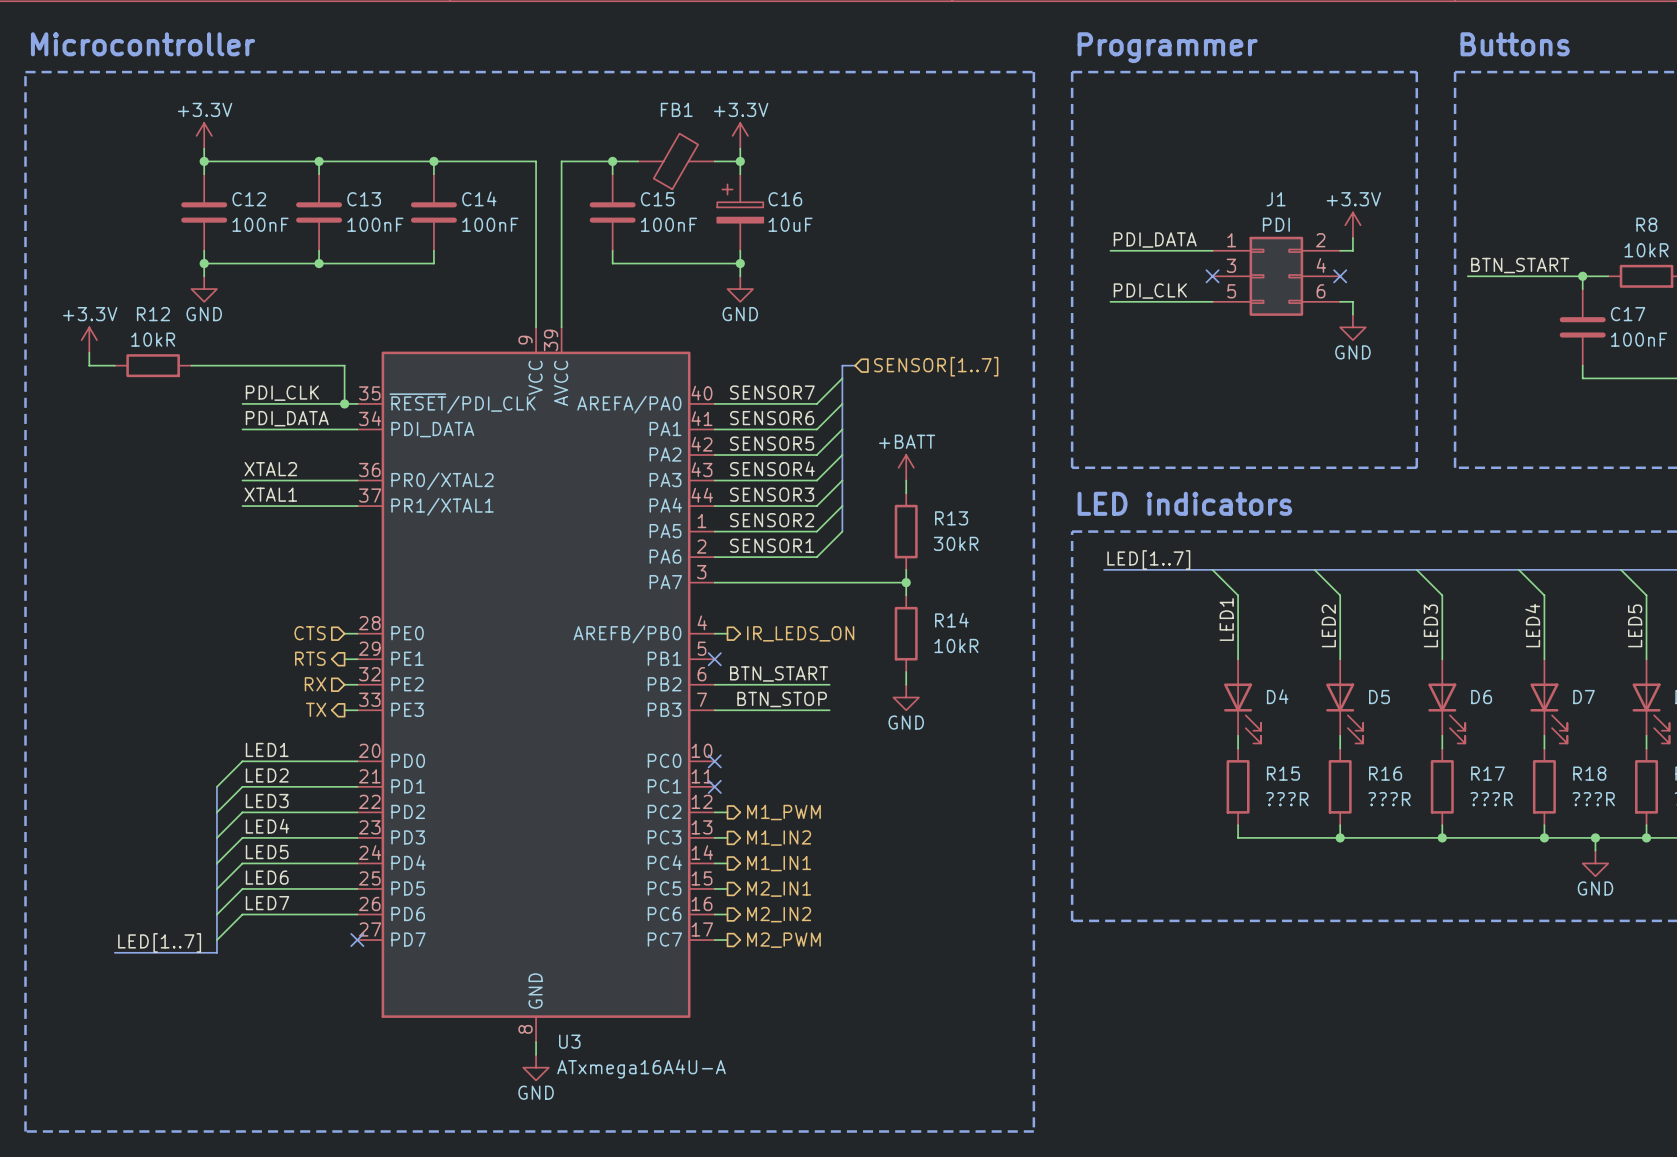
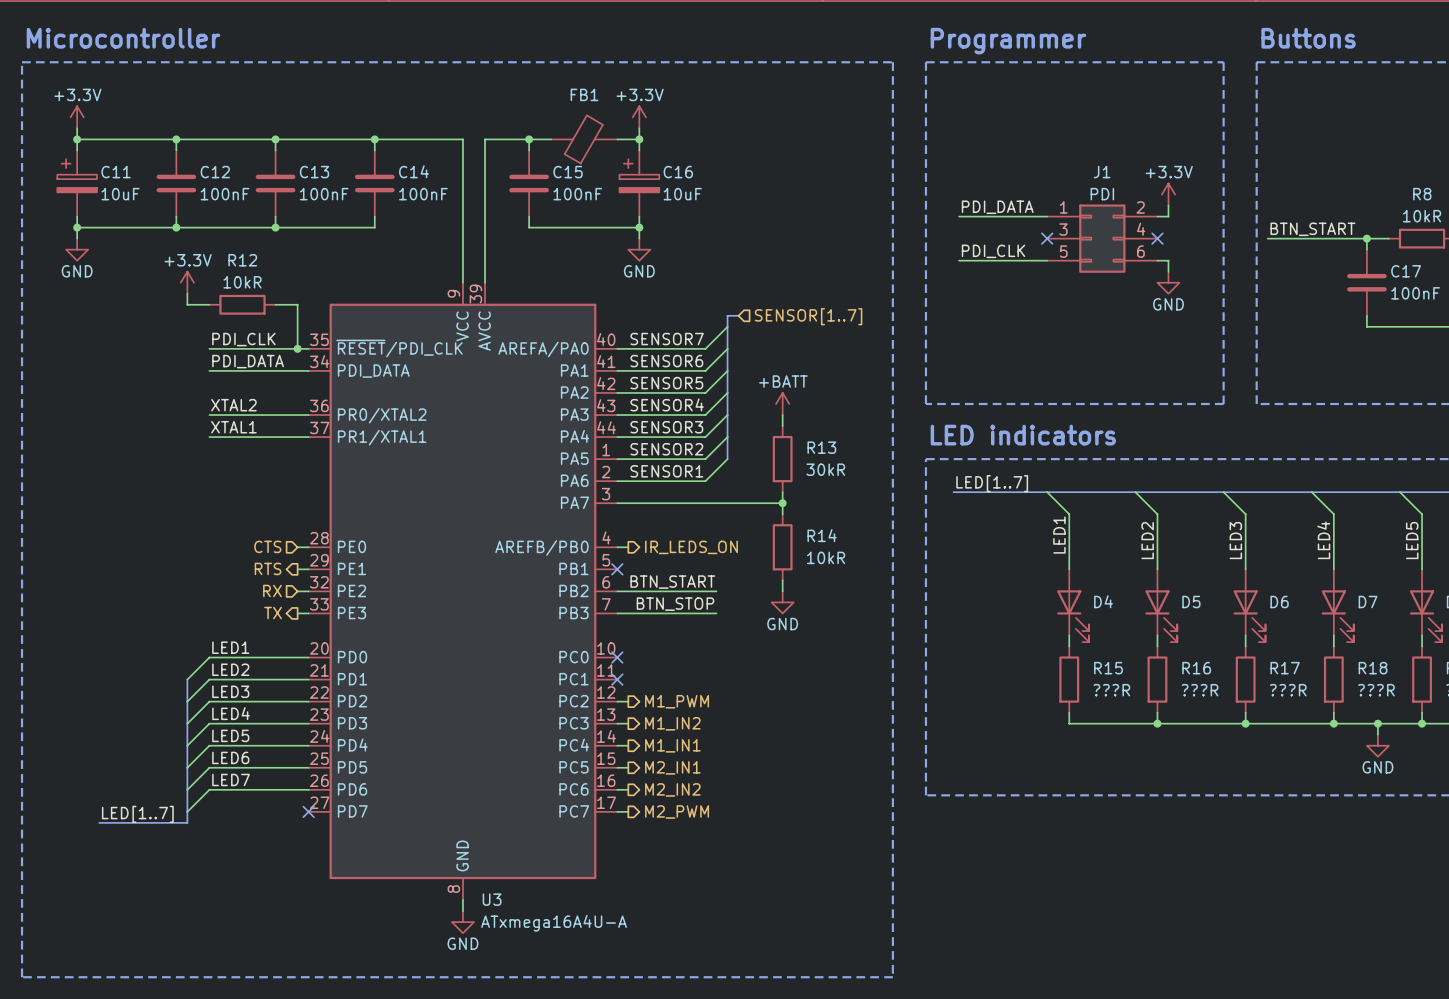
power symbol: none -> +3.3V (77, 117)
power symbol: +3.3V (204, 135) -> none
wire: none -> (77, 128) (77, 150)
wire: (204, 148) (204, 161) -> (77, 139) (176, 139)
junction: none -> (77, 139)
C11: none -> 10uF (77, 183)
wire: none -> (77, 216) (77, 238)
junction: none -> (77, 227)
wire: (204, 263) (204, 276) -> (176, 227) (77, 227)
power symbol position: GND (204, 289) -> GND (77, 249)
power symbol: none -> +3.3V (187, 282)
power symbol: +3.3V (89, 340) -> none
wire: (89, 352) (89, 365) (114, 365) -> (187, 293) (187, 304) (209, 304)
R12 position: (153, 365) -> (242, 304)
wire: (191, 365) (344, 365) -> (275, 304) (297, 304) (297, 315)

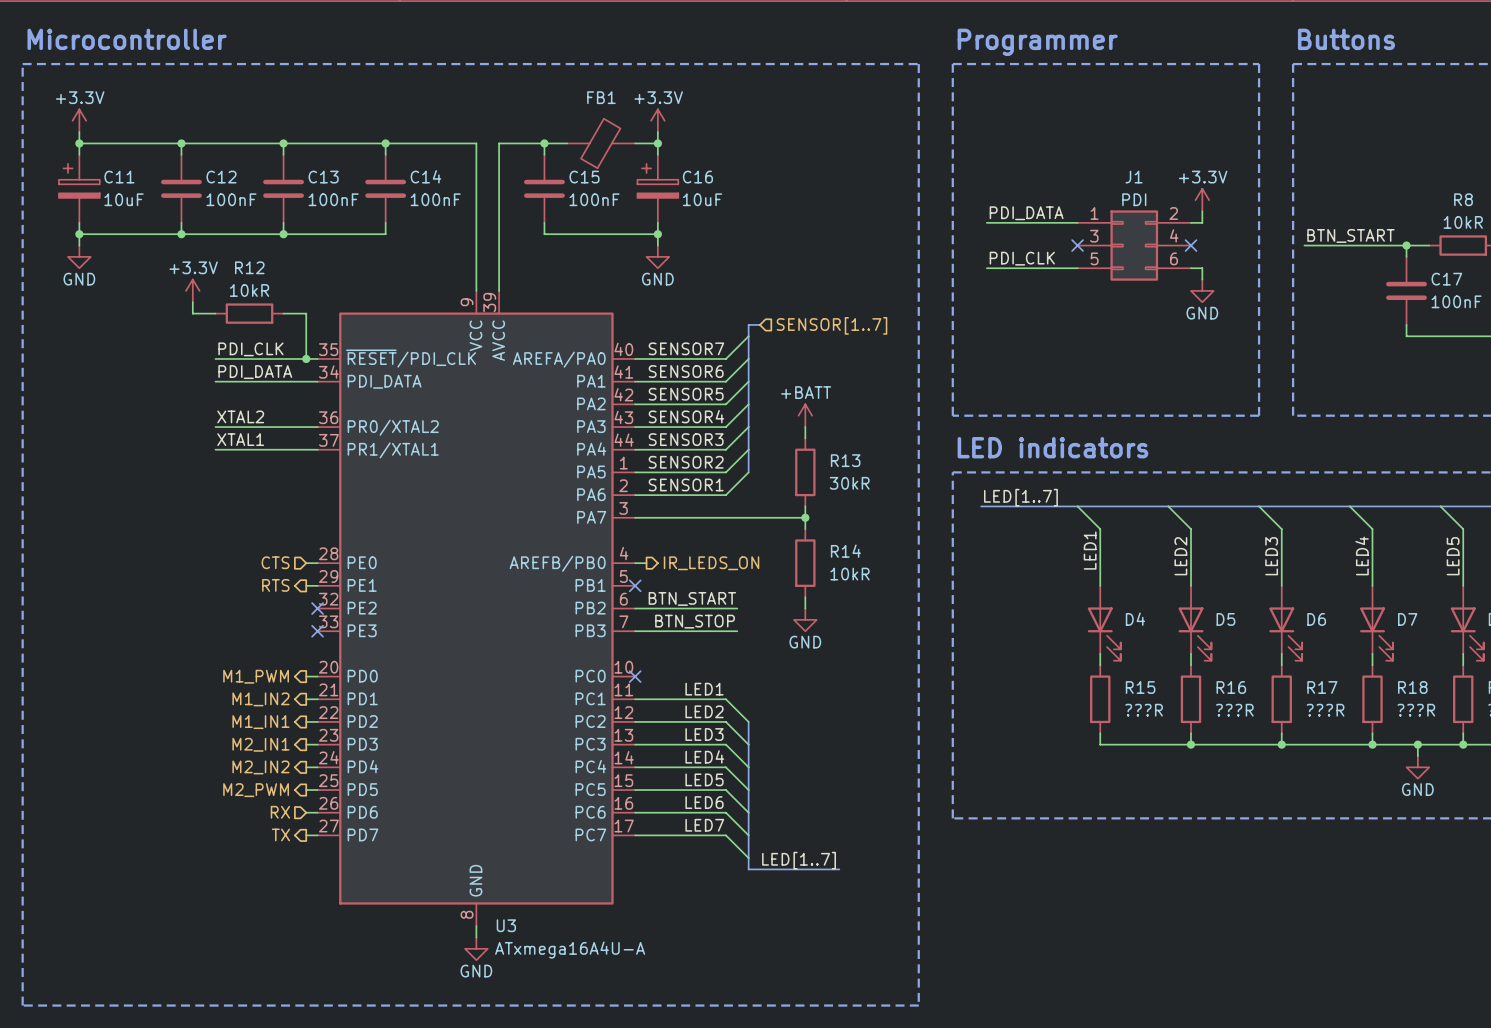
hierarchical label position: RX (272, 590) -> RX (280, 812)
wire: (297, 591) (308, 591) -> none
no-connect mark: none -> (317, 608)
hierarchical label position: TX (273, 613) -> TX (280, 834)
wire: (297, 613) (308, 613) -> (306, 835) (317, 835)
no-connect mark: none -> (317, 631)
label: LED1 (230, 647) -> none
hierarchical label: none -> M1_PWM (256, 676)
wire: (297, 657) (209, 657) (187, 679) -> none
label: LED2 (230, 669) -> none
label: none -> LED1 (704, 689)
bus: (187, 679) (187, 822) (99, 822) -> none
hierarchical label: none -> M1_IN2 (260, 699)
wire: (297, 679) (209, 679) (187, 701) -> none
wire: none -> (635, 699) (725, 699) (748, 721)
no-connect mark: (617, 679) -> none
label: LED3 (230, 691) -> none
label: none -> LED2 (704, 711)
hierarchical label: none -> M1_IN1 (260, 722)
wire: (297, 701) (209, 701) (187, 723) -> none
wire: none -> (646, 721) (725, 721) (748, 744)
hierarchical label: M1_PWM (677, 701) -> none
bus: none -> (748, 721) (748, 869) (839, 869)
label: LED4 (231, 713) -> none
label: none -> LED3 (704, 734)
hierarchical label: none -> M2_IN1 (260, 744)
wire: (297, 723) (209, 723) (187, 745) -> none
wire: none -> (646, 744) (725, 744) (748, 767)
hierarchical label: M1_IN2 (672, 723) -> none
label: LED5 (230, 735) -> none
label: none -> LED4 (704, 756)
hierarchical label: none -> M2_IN2 (260, 767)
wire: (297, 745) (209, 745) (187, 767) -> none
wire: none -> (646, 767) (725, 767) (748, 790)
hierarchical label: M1_IN1 (672, 745) -> none
label: LED6 (230, 757) -> none
label: none -> LED5 (704, 779)
hierarchical label: none -> M2_PWM (256, 790)
wire: (297, 767) (209, 767) (187, 789) -> none
wire: none -> (646, 790) (725, 790) (748, 812)
hierarchical label: M2_IN1 (672, 767) -> none
label: LED7 (231, 779) -> none
label: none -> LED6 (704, 802)
wire: (297, 789) (209, 789) (187, 811) -> none
wire: none -> (646, 812) (725, 812) (748, 835)
hierarchical label: M2_IN2 (672, 789) -> none
label: none -> LED7 (704, 825)
no-connect mark: (308, 811) -> none
wire: none -> (646, 835) (725, 835) (748, 858)
hierarchical label: M2_PWM (677, 811) -> none
label: LED[1..7] (137, 814) -> none
label: none -> LED[1..7] (799, 860)

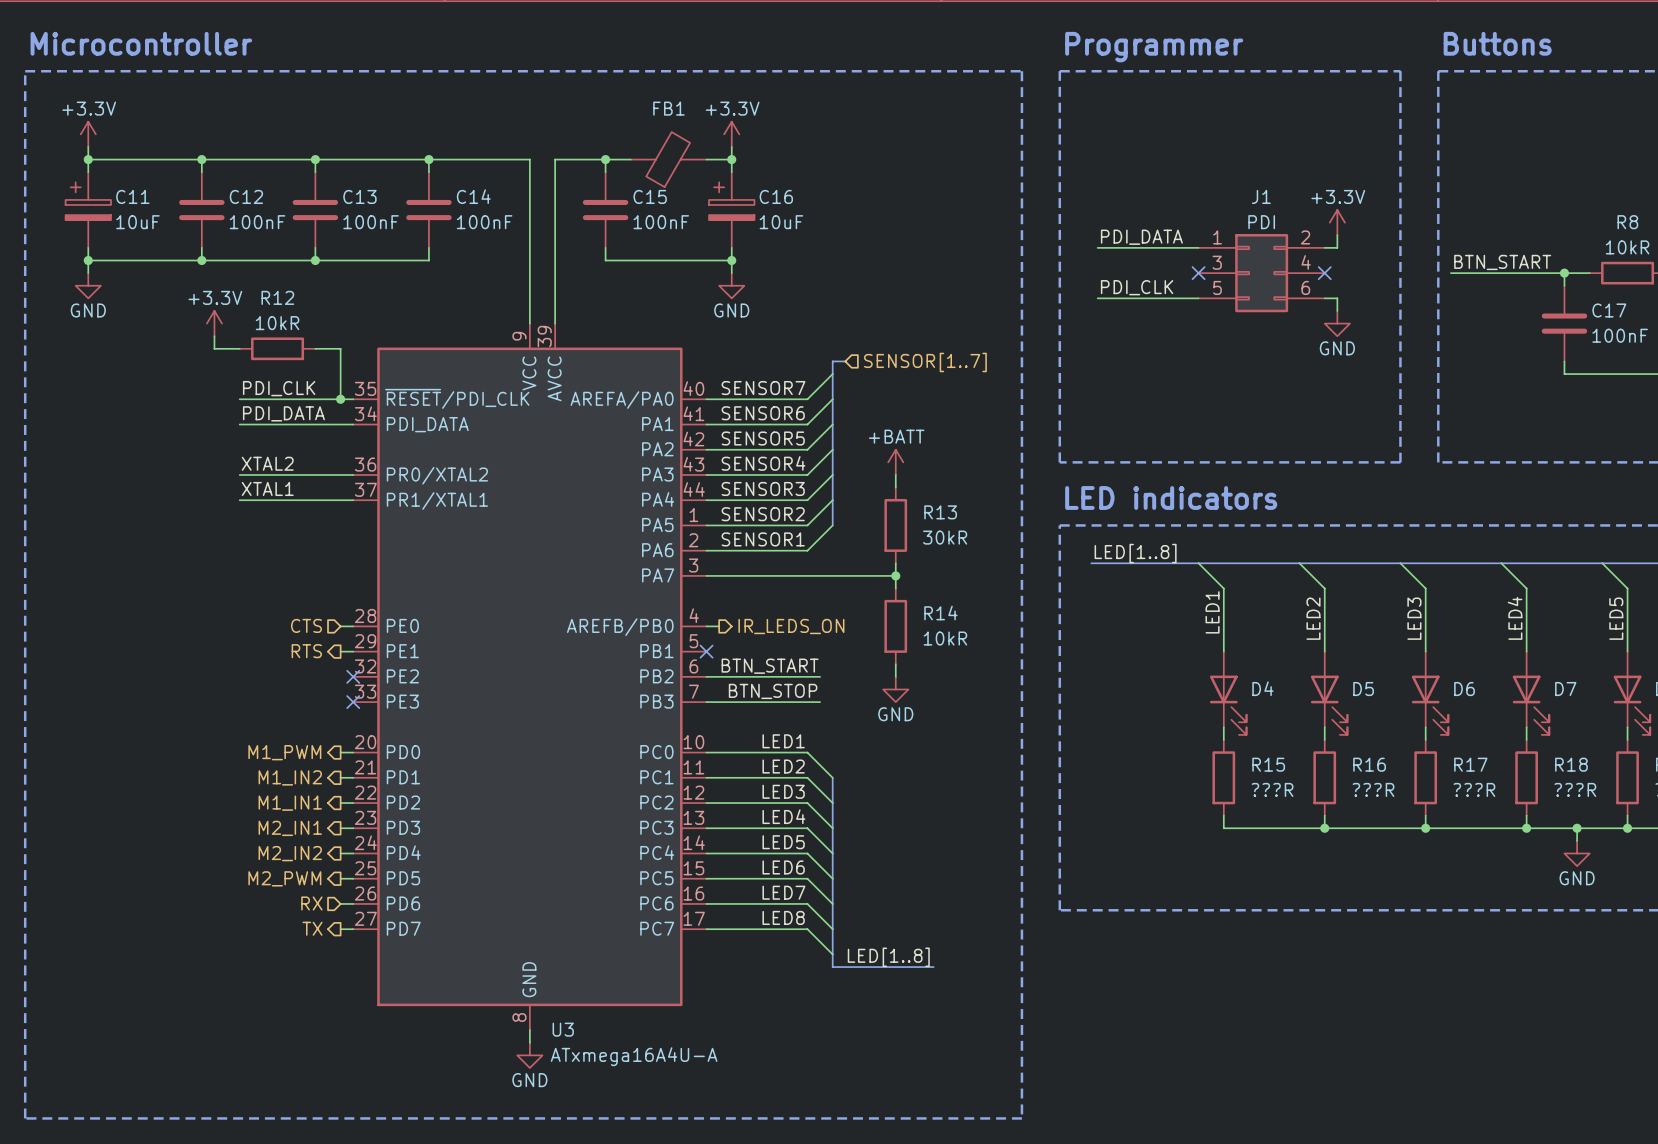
label: LED[1..7] (1020, 497) -> LED[1..8] (1135, 553)
label: none -> LED1 (783, 741)
wire: none -> (706, 752) (807, 752) (832, 777)
no-connect mark: (635, 676) -> none
label: LED1 (704, 689) -> LED2 (783, 766)
bus: none -> (832, 777) (832, 803)
label: LED2 (704, 711) -> LED3 (783, 791)
label: LED3 (704, 734) -> LED4 (783, 816)
label: LED4 (704, 756) -> LED5 (783, 842)
label: LED5 (704, 779) -> LED6 (783, 867)
label: LED6 (704, 802) -> LED7 (783, 892)
label: LED7 (704, 825) -> LED8 (783, 917)
label: LED[1..7] (799, 860) -> LED[1..8] (888, 957)

